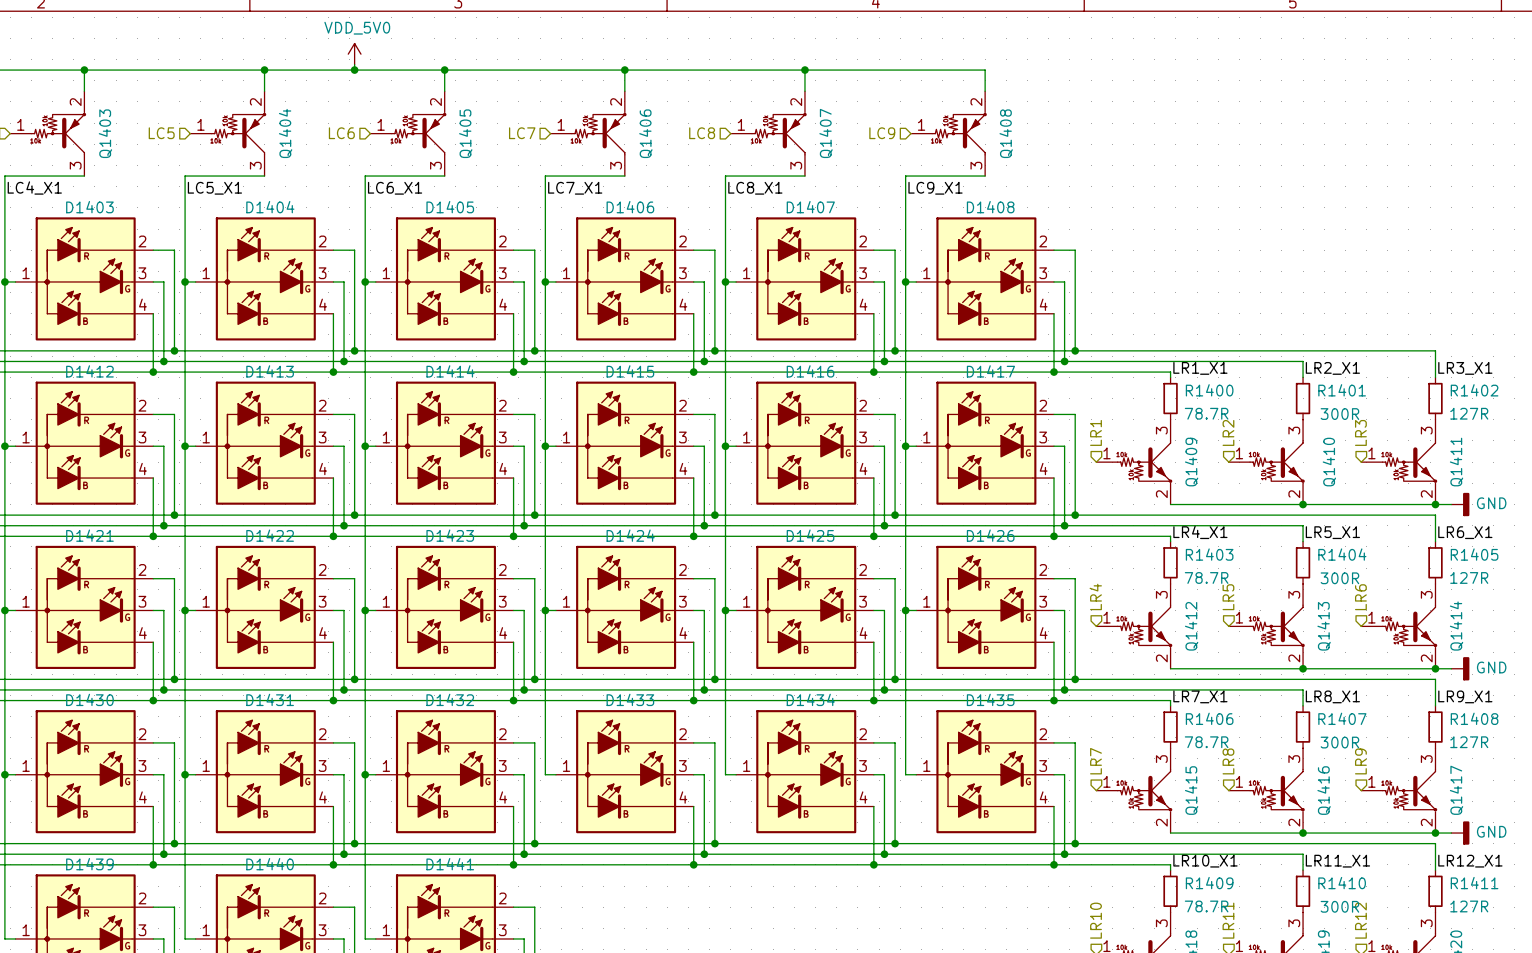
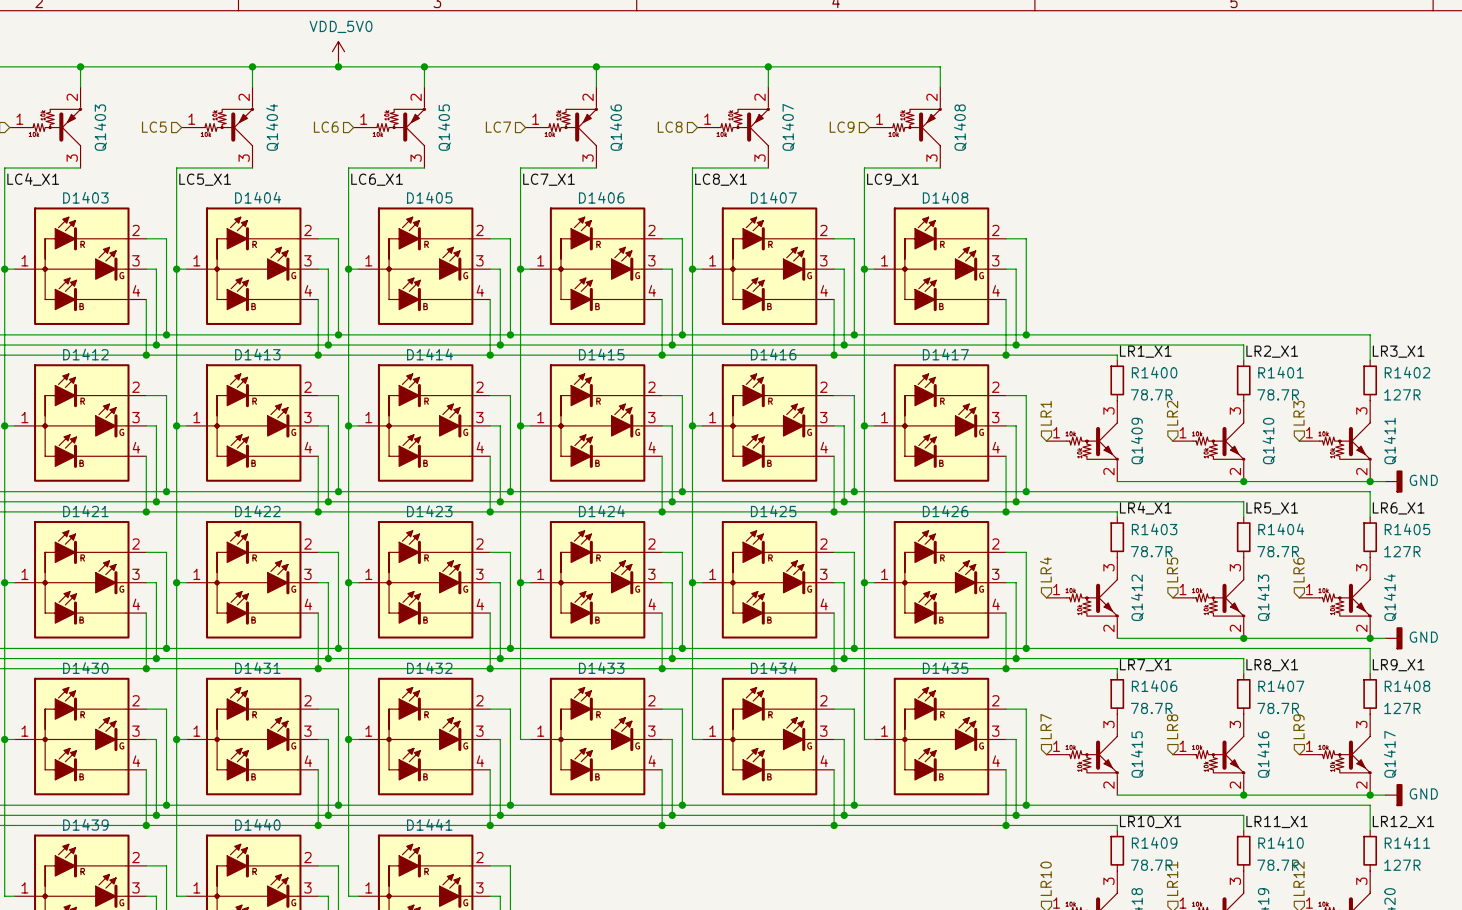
R1401 value: 300R (1339, 414) -> 78.7R (1278, 394)
R1404 value: 300R (1339, 578) -> 78.7R (1278, 551)
R1407 value: 300R (1339, 742) -> 78.7R (1278, 708)
R1410 value: 300R (1339, 906) -> 78.7R (1278, 865)

